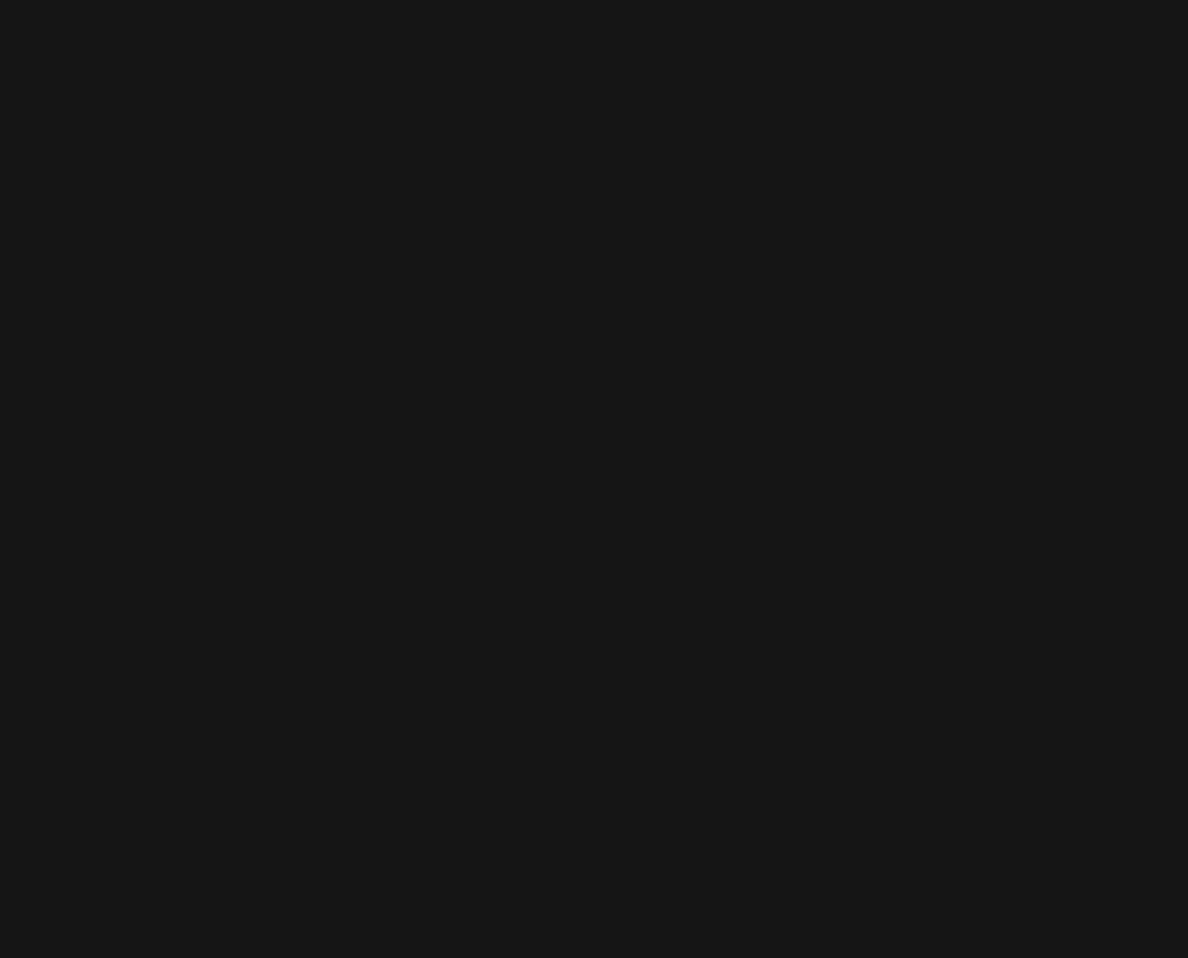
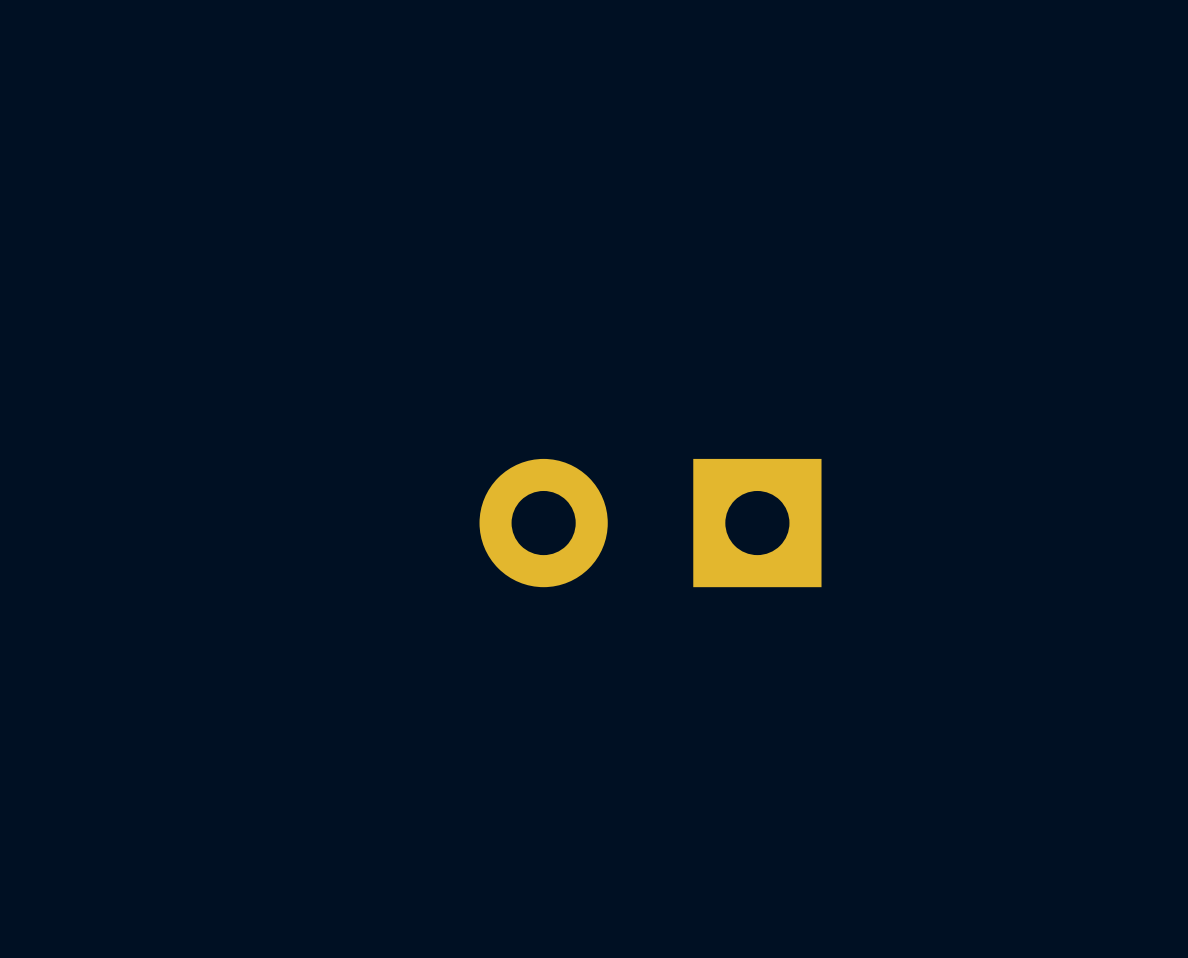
part: none -> (650, 523)

